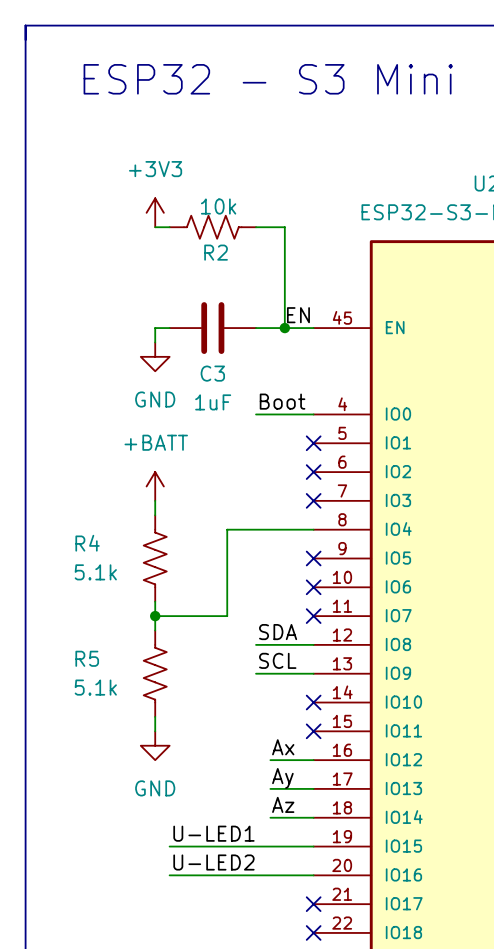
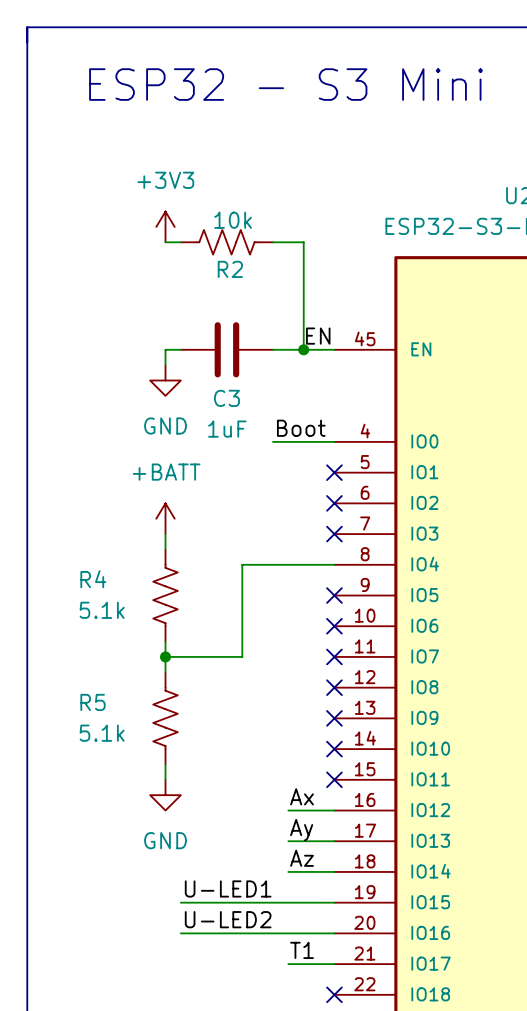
label: SDA (278, 632) -> none
wire: (256, 644) (313, 644) -> none
no-connect mark: none -> (334, 687)
label: SCL (277, 660) -> none
wire: (256, 673) (313, 673) -> none
no-connect mark: none -> (334, 718)
label: none -> T1 (302, 950)
wire: none -> (288, 964) (334, 964)
no-connect mark: (313, 904) -> none

